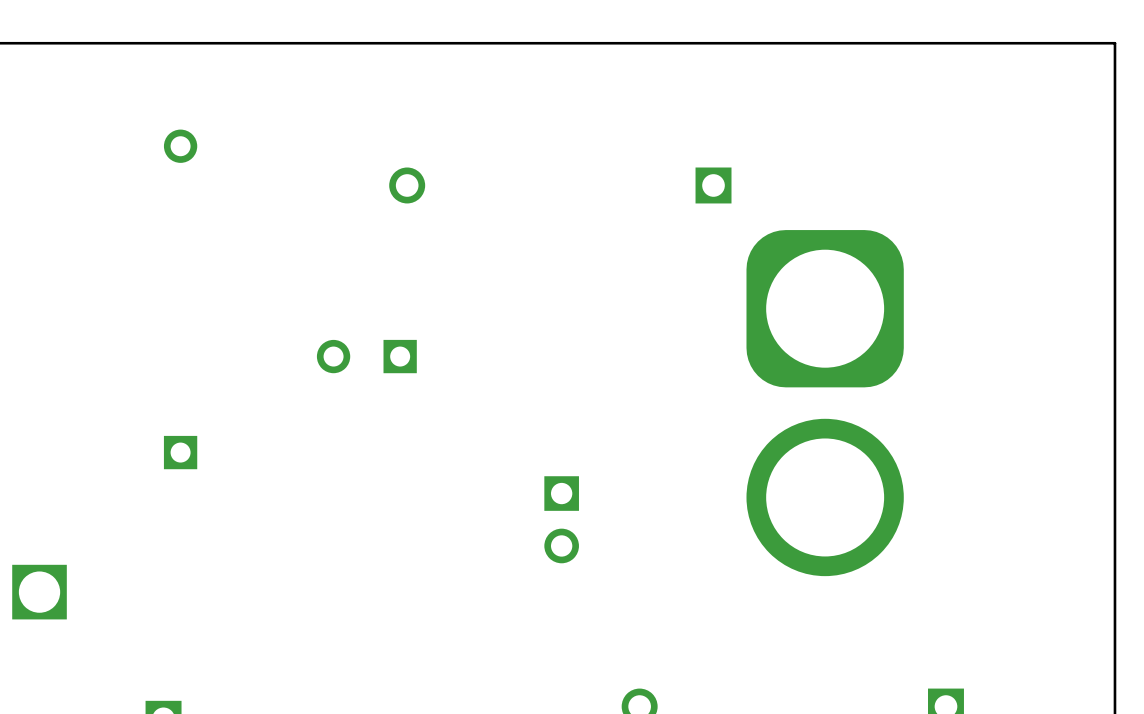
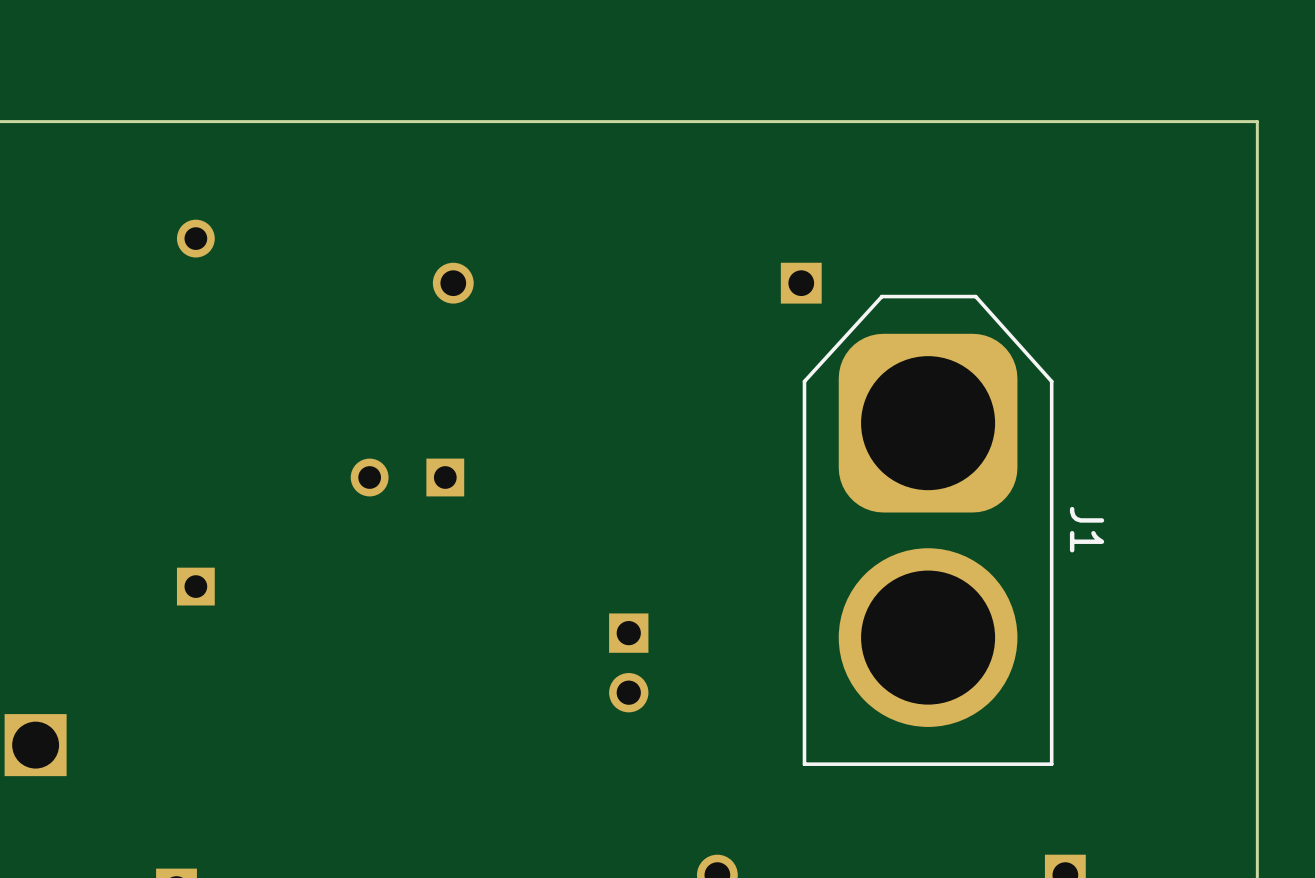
J1: none -> (928, 530)

